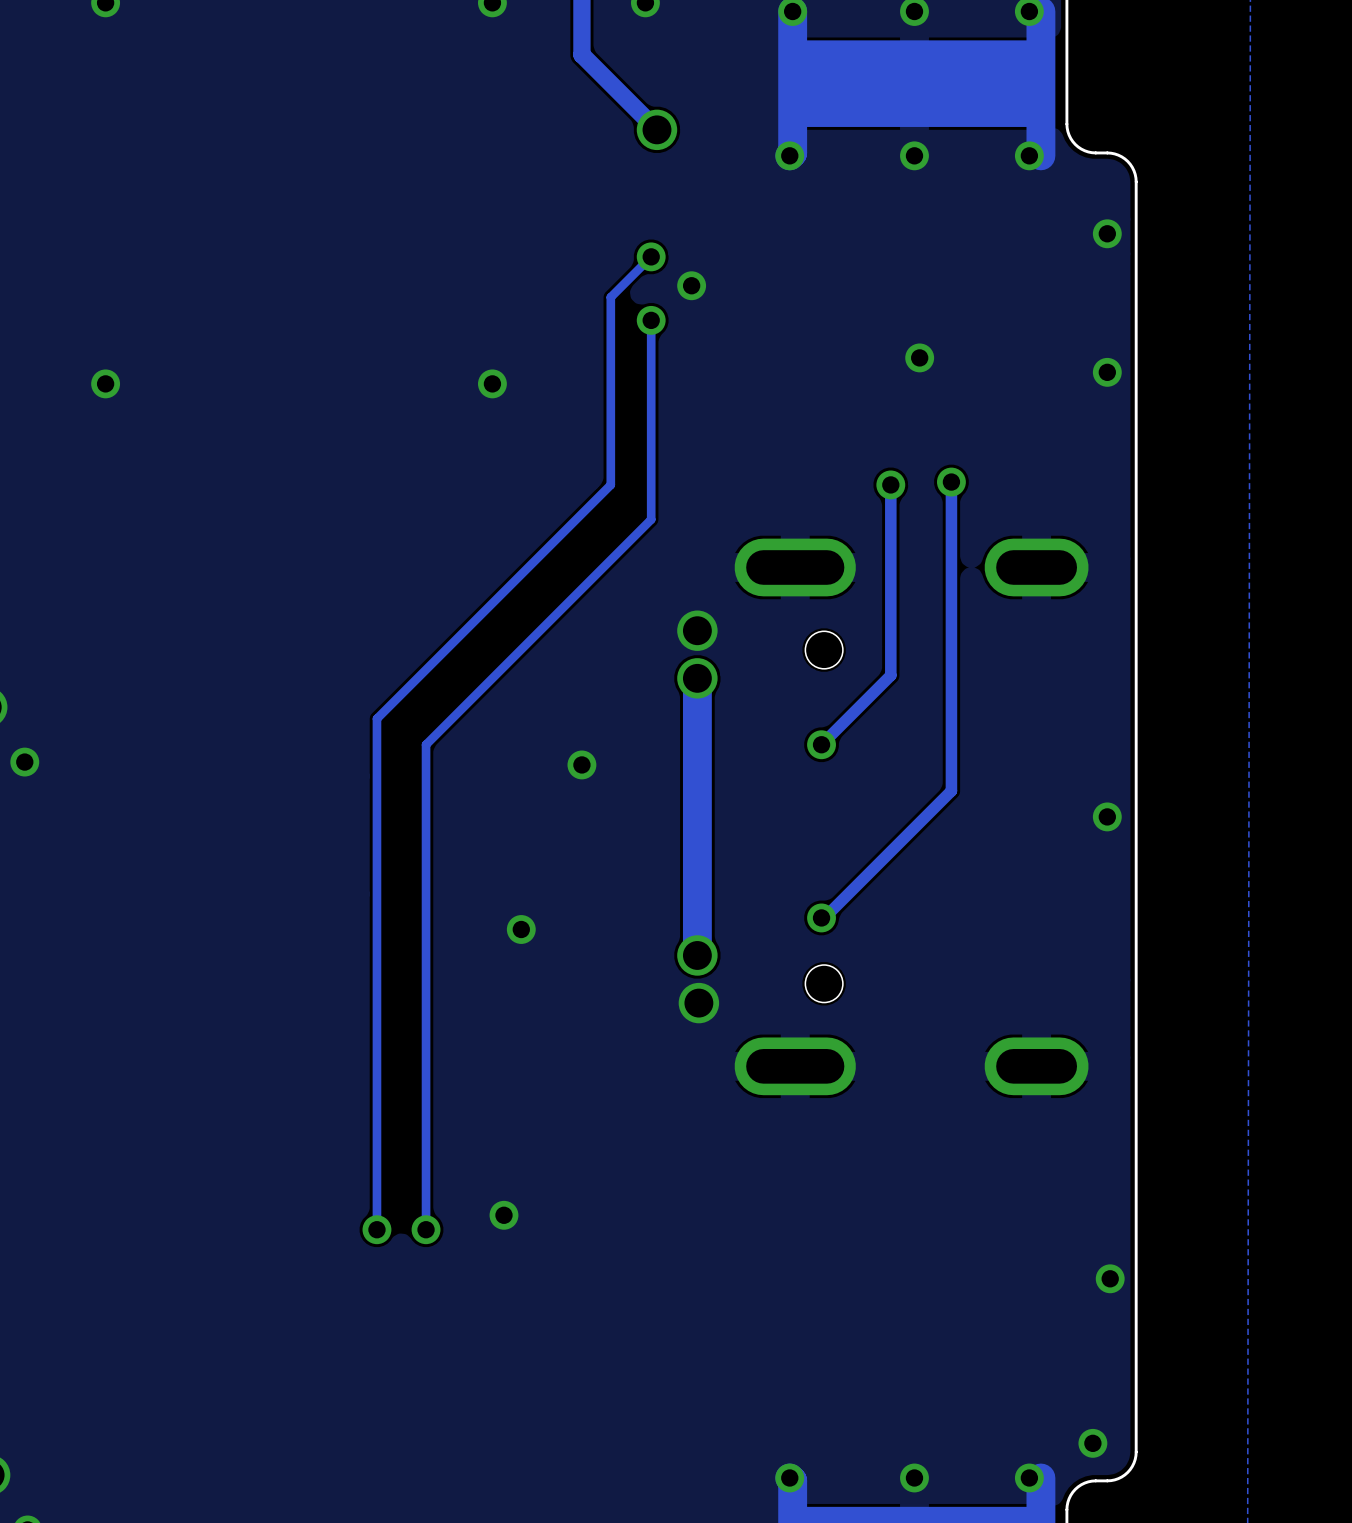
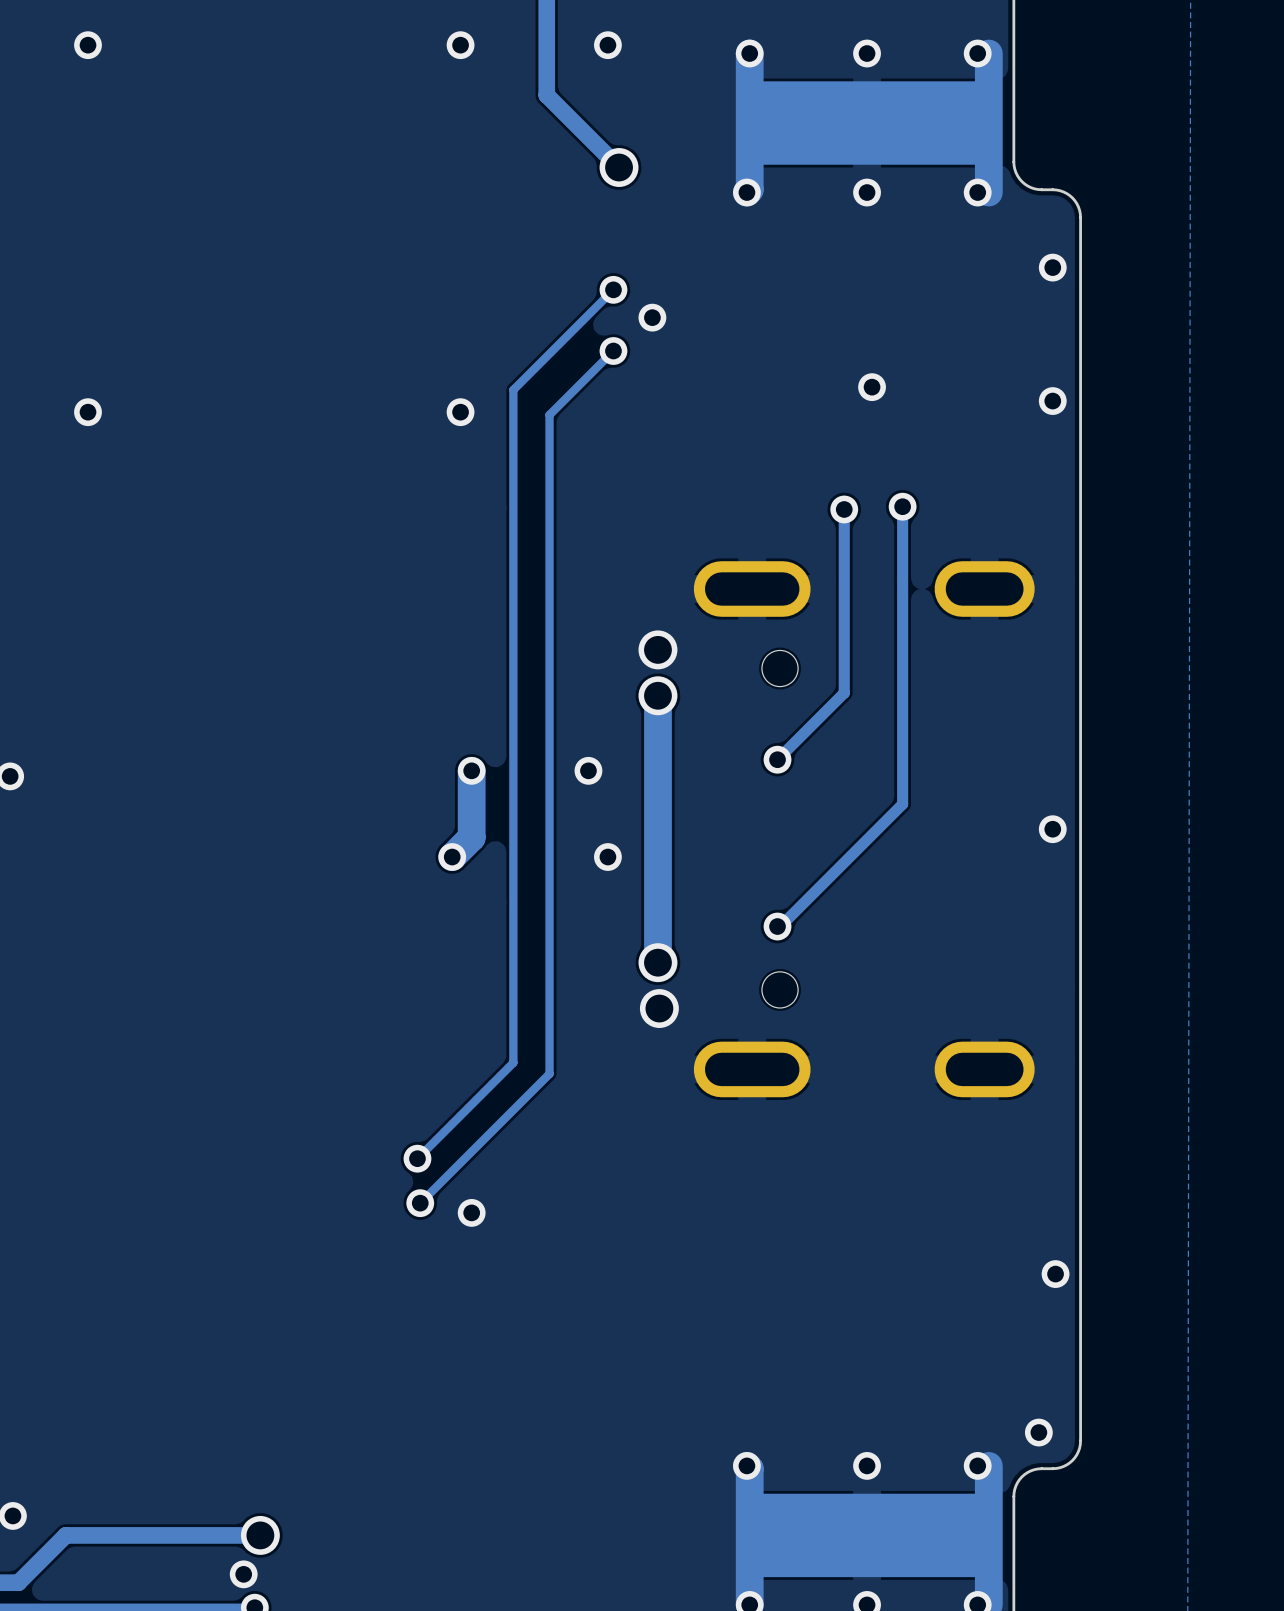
track: (610, 297) (610, 484) (376, 718) (376, 1229) -> (574, 328) (513, 389) (513, 1062) (417, 1158)
track: (651, 320) (651, 519) (426, 744) (426, 1229) -> (613, 351) (549, 414) (549, 1073) (420, 1203)
track: none -> (471, 770) (471, 837) (452, 857)
via: none -> (471, 770)
via: none -> (588, 770)
via: (581, 764) -> none
via: none -> (452, 857)
via: none -> (607, 857)
via: (521, 929) -> none
via: none -> (417, 1158)
via: (376, 1229) -> none
via position: (426, 1229) -> (420, 1203)

